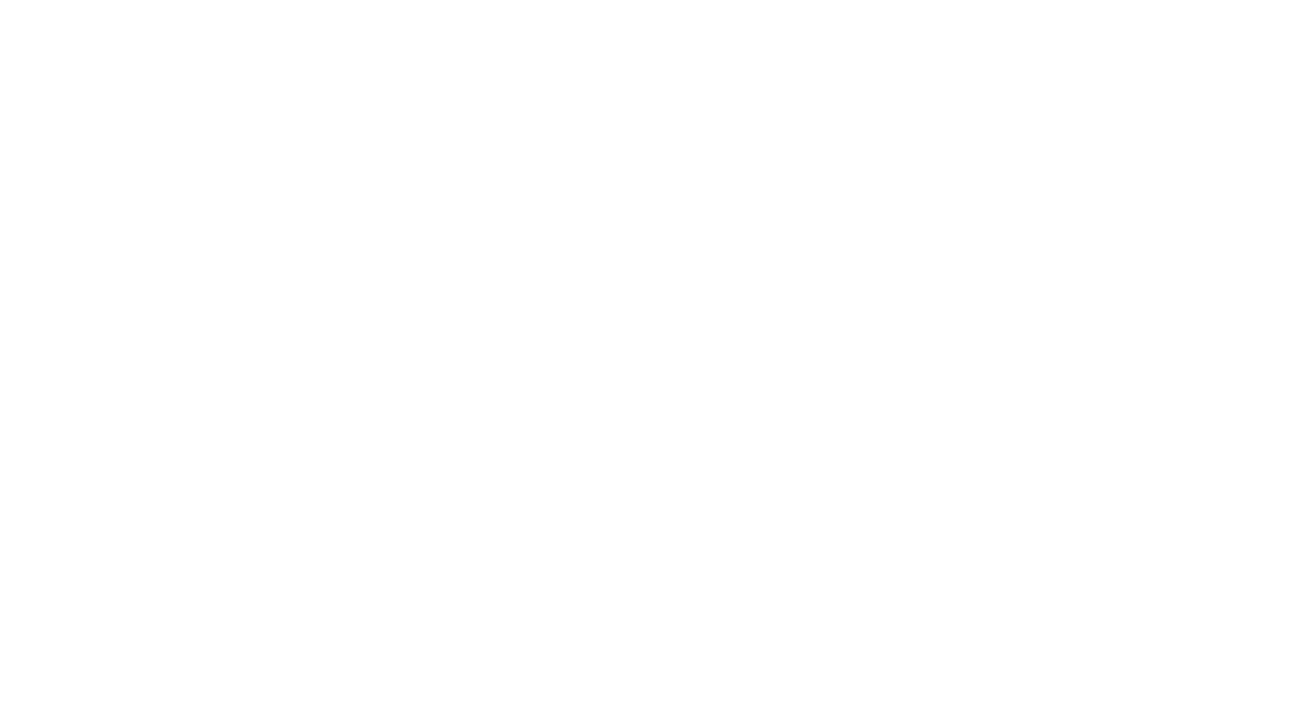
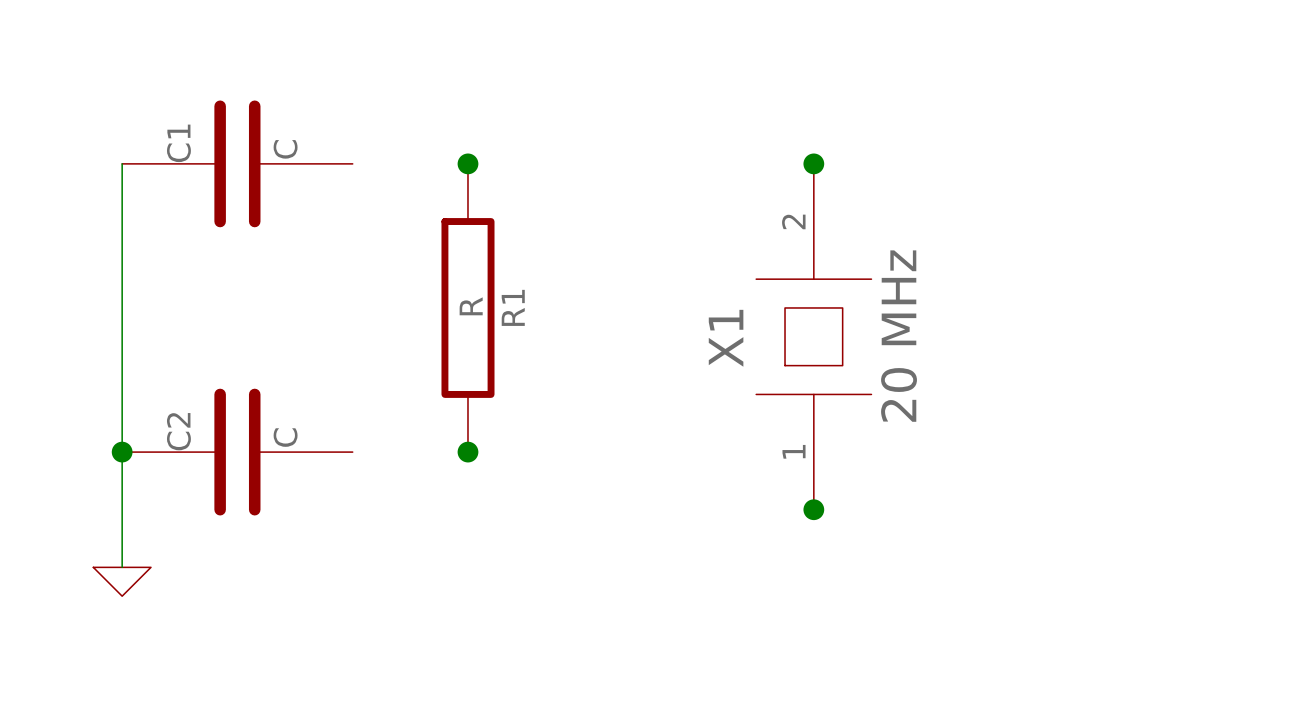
wire: none -> (122, 163) (122, 567)
C1: none -> C (237, 163)
junction: none -> (467, 163)
junction: none -> (813, 163)
R1: none -> R (467, 307)
X1: none -> 20 MHz (813, 336)
junction: none -> (122, 452)
C2: none -> C (237, 452)
junction: none -> (467, 452)
junction: none -> (813, 509)
power symbol: none -> (122, 581)

